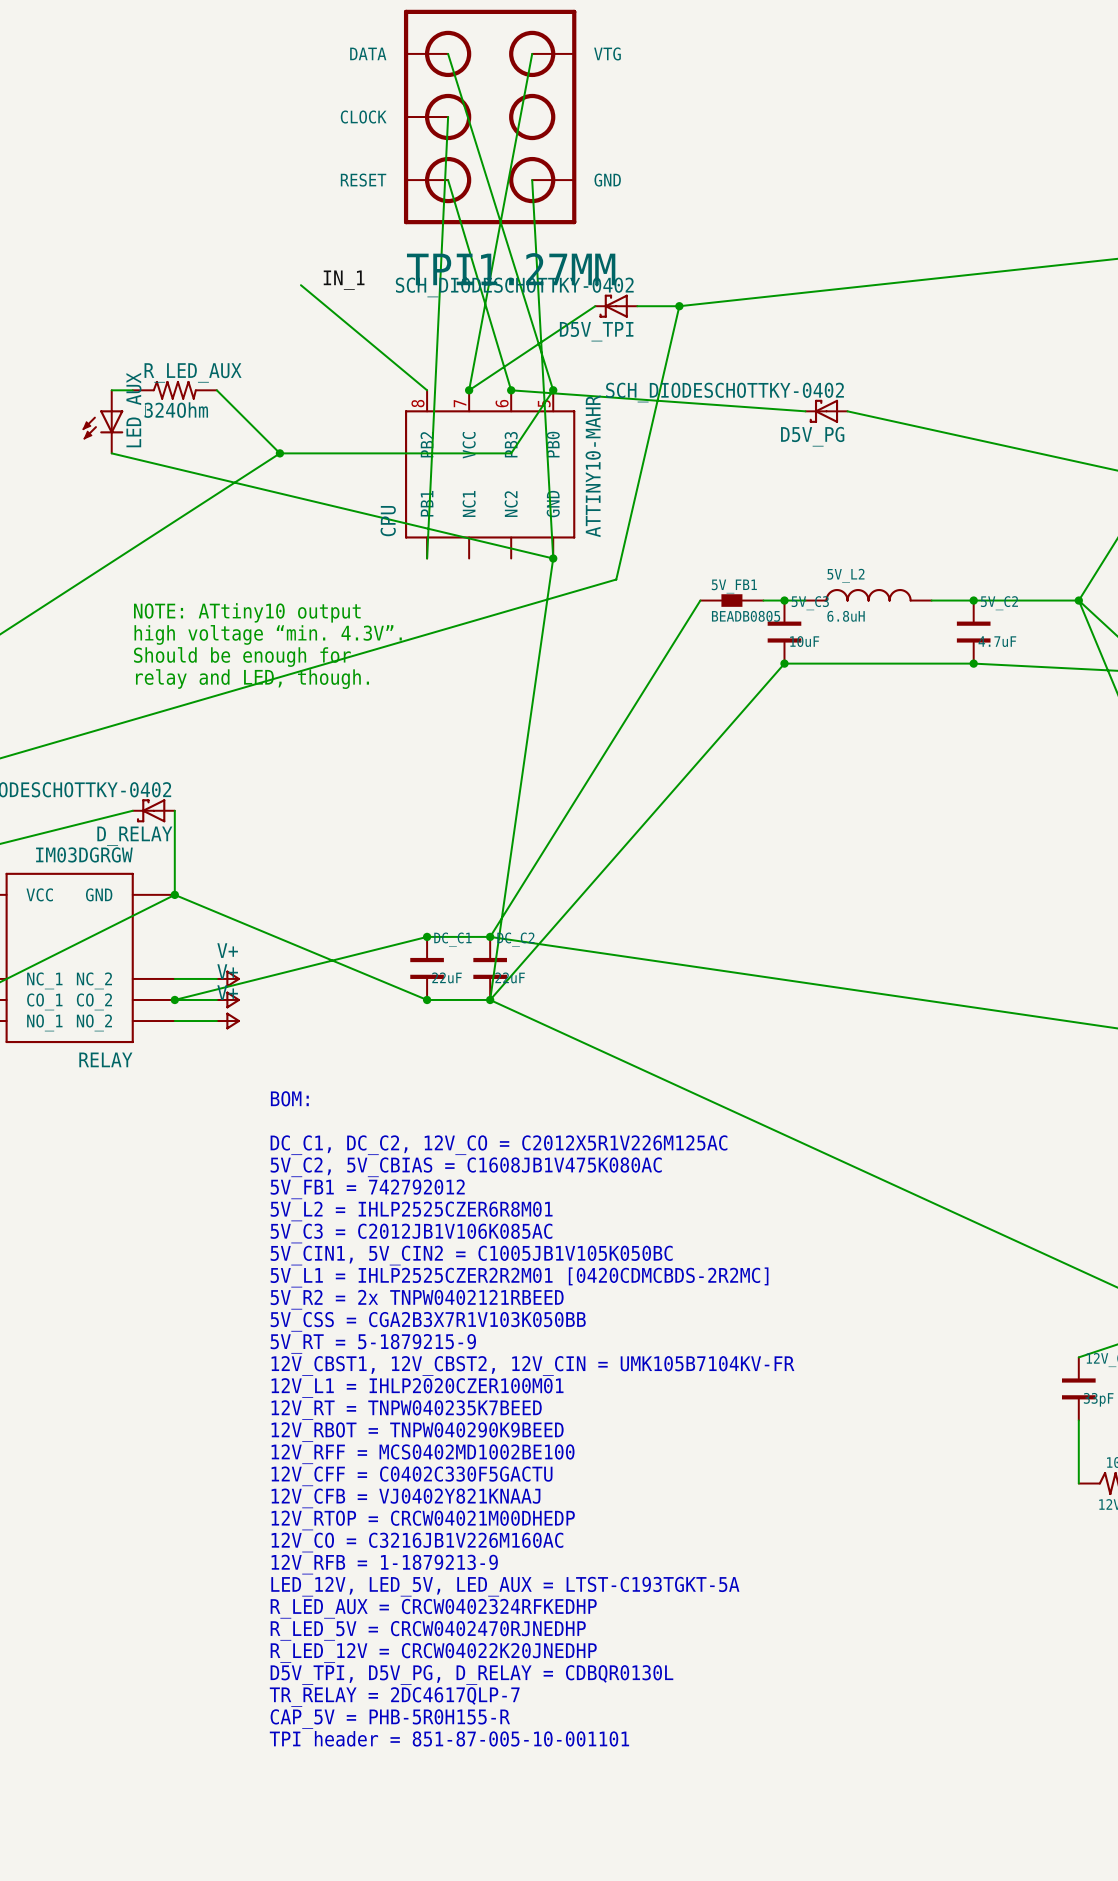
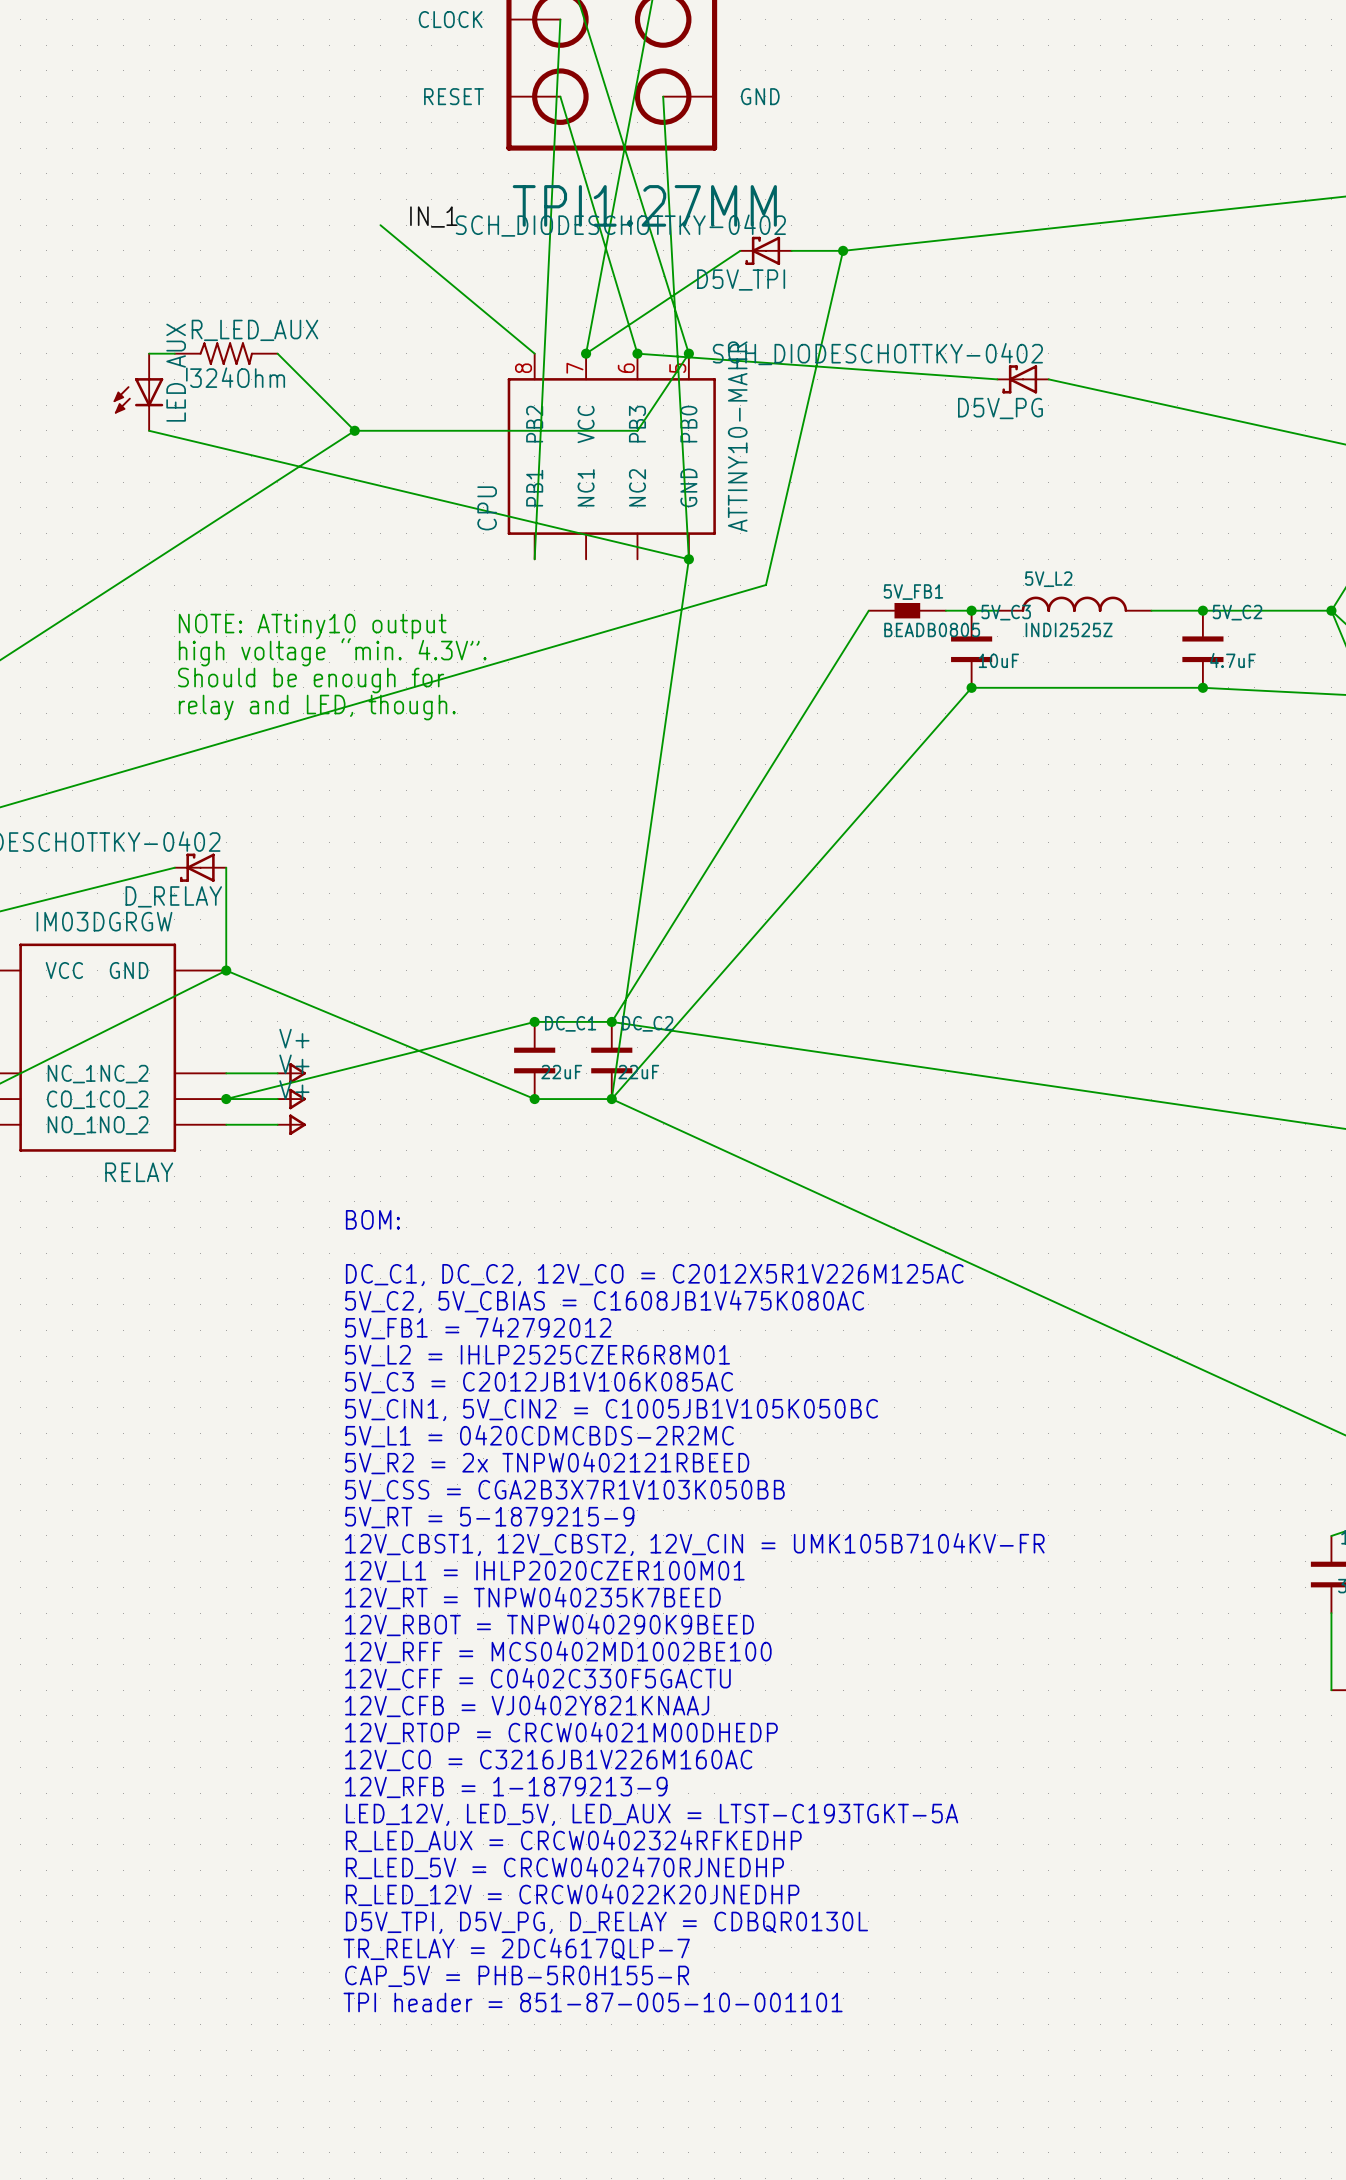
5V_L2 value: 6.8uH (846, 616) -> INDI2525Z (1069, 629)
text: 5V_L1 = IHLP2525CZER2R2M01 [0420CDMCBDS-2R2MC] (519, 1277) -> 5V_L1 = 0420CDMCBDS-2R2MC (539, 1436)

